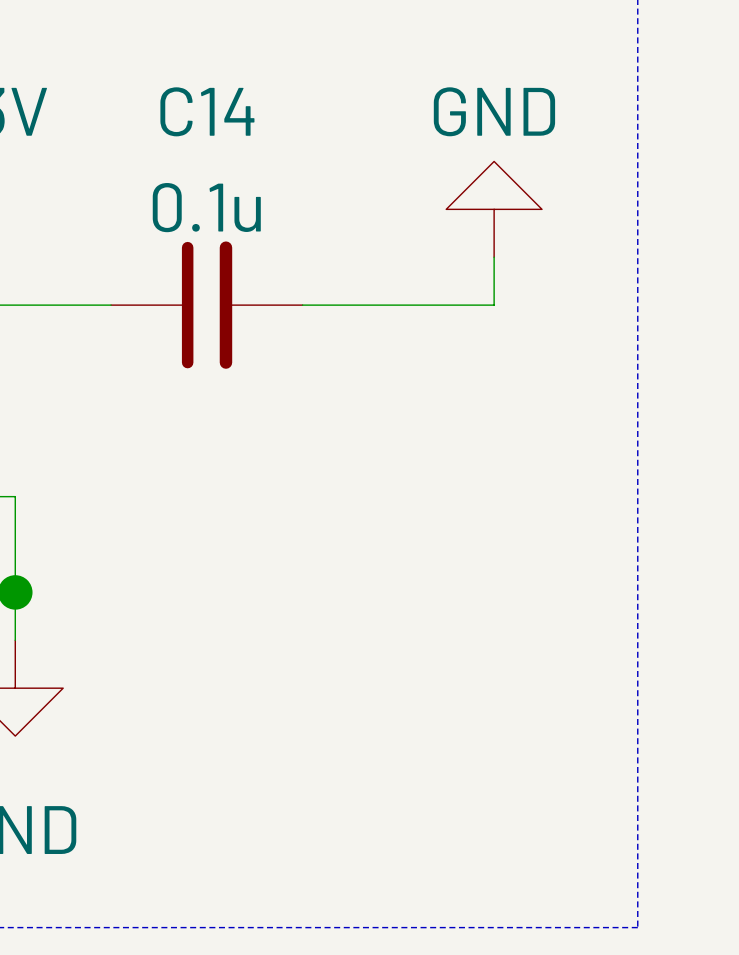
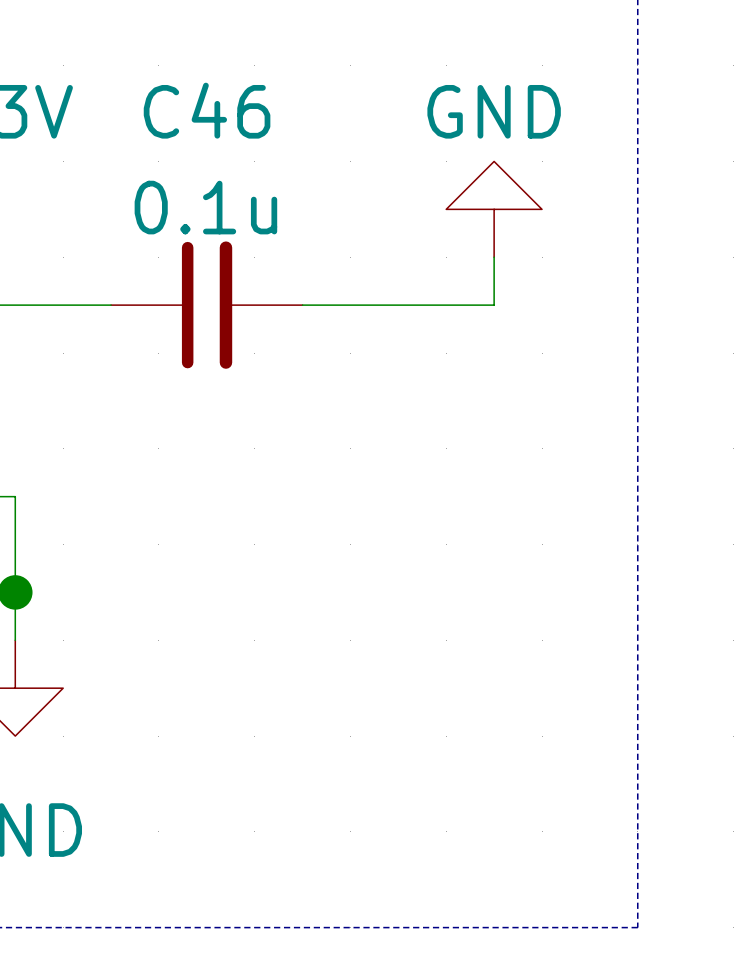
C14 name: C14 (207, 111) -> C46 (207, 110)

